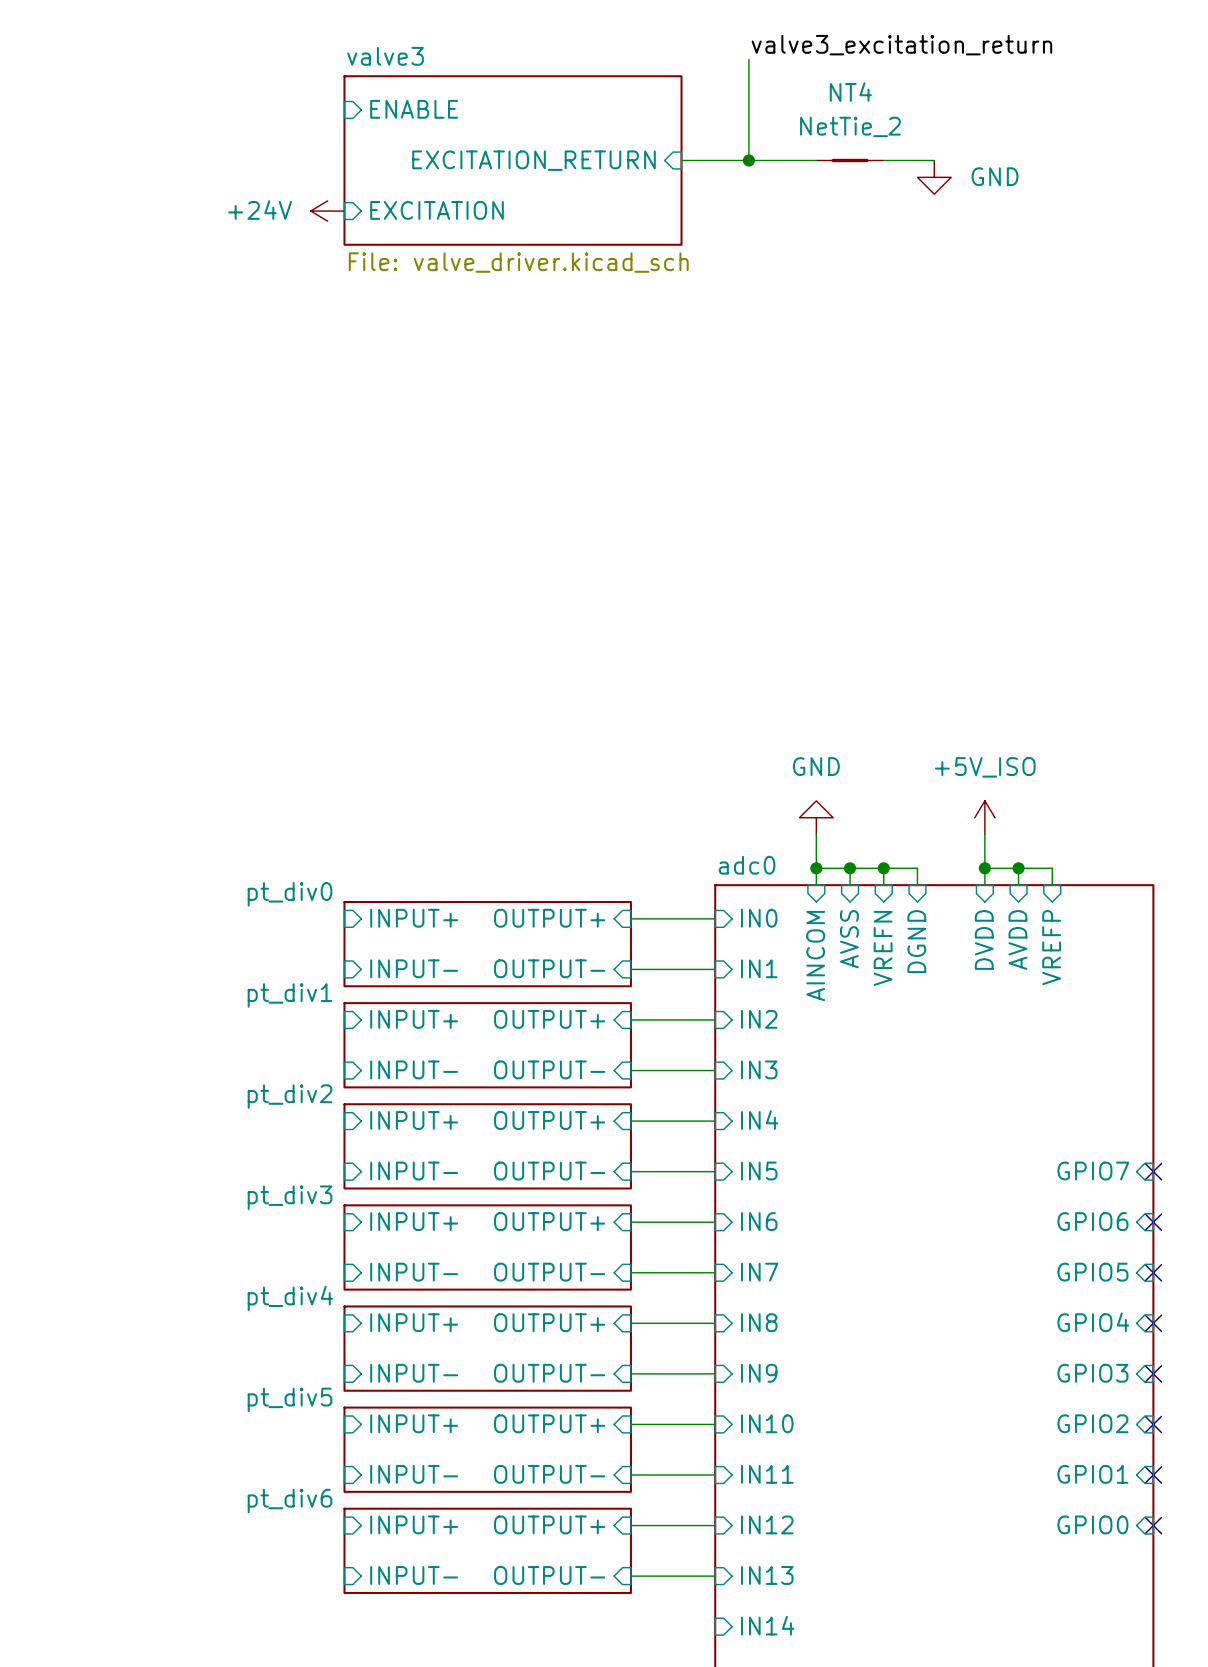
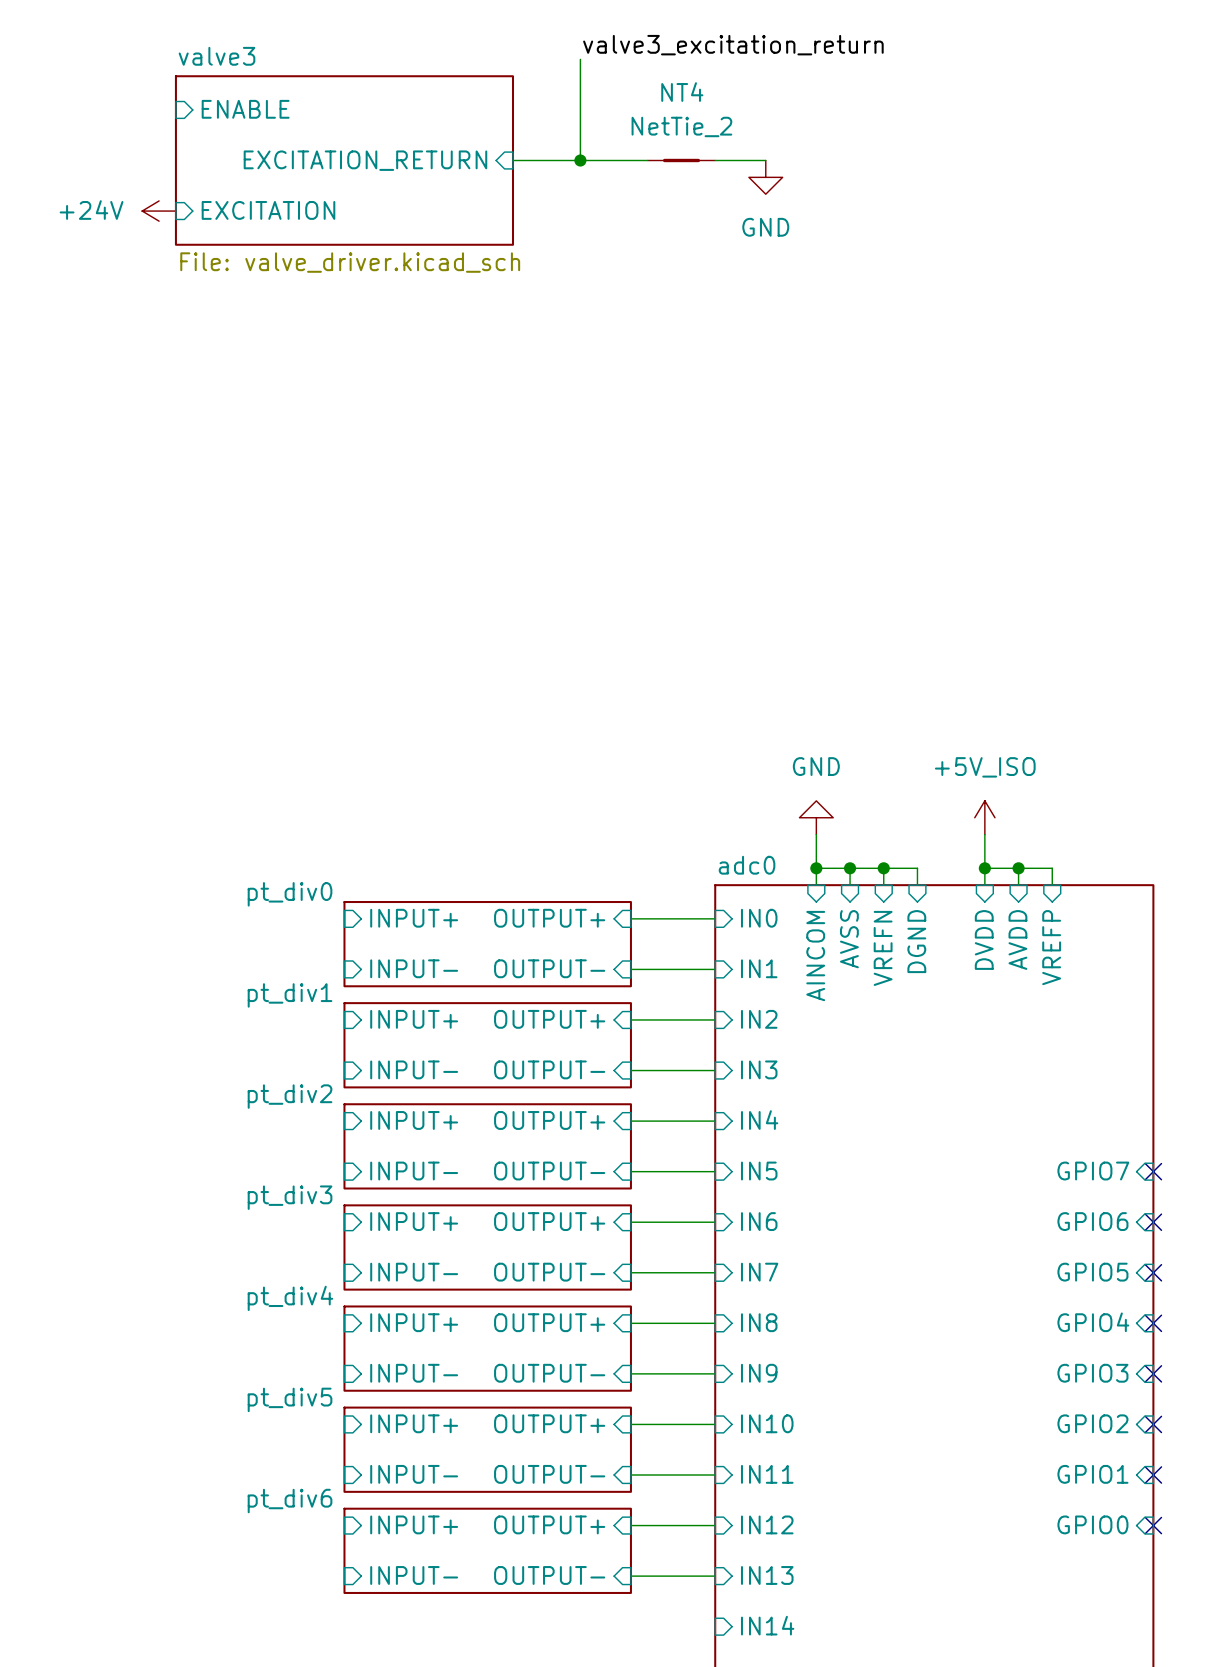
label position: valve3_excitation_return (901, 45) -> valve3_excitation_return (733, 45)
wire: (748, 59) (748, 160) -> (580, 59) (580, 160)
sheet pin position: ENABLE (414, 109) -> ENABLE (245, 109)
wire: none -> (512, 160) (647, 160)
sheet valve3 position: (512, 160) -> (344, 160)
sheet pin position: EXCITATION_RETURN (533, 160) -> EXCITATION_RETURN (365, 160)
junction: none -> (580, 160)
junction: (748, 160) -> none
wire: (765, 160) (816, 160) -> none
NT4 position: (850, 160) -> (681, 160)
wire: (883, 160) (934, 160) -> none
power symbol text position: GND (995, 176) -> GND (765, 227)
power symbol position: GND (934, 177) -> GND (765, 177)
sheet pin position: EXCITATION (437, 210) -> EXCITATION (268, 210)
power symbol position: +24V (327, 211) -> +24V (159, 211)

